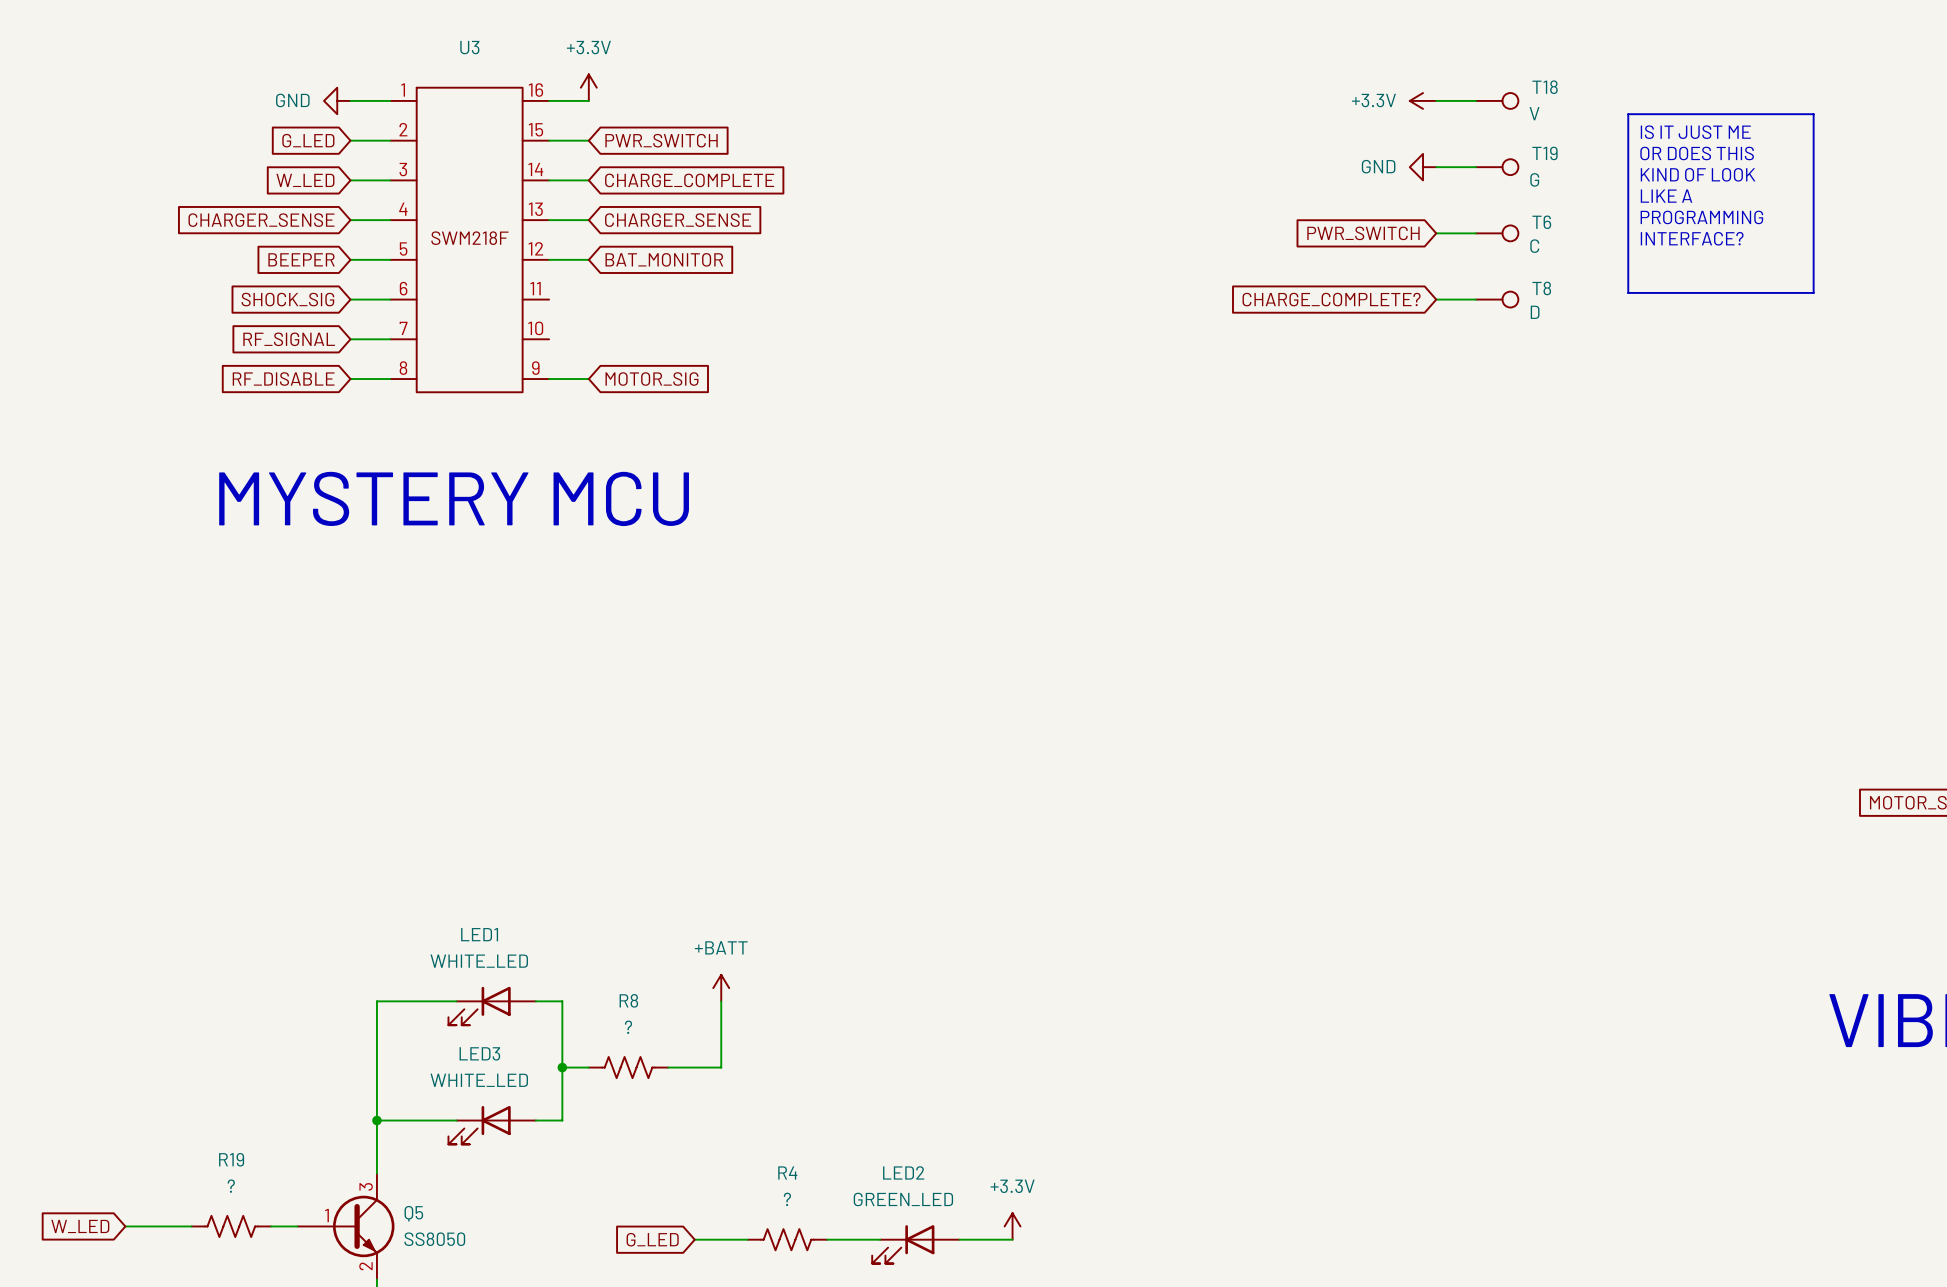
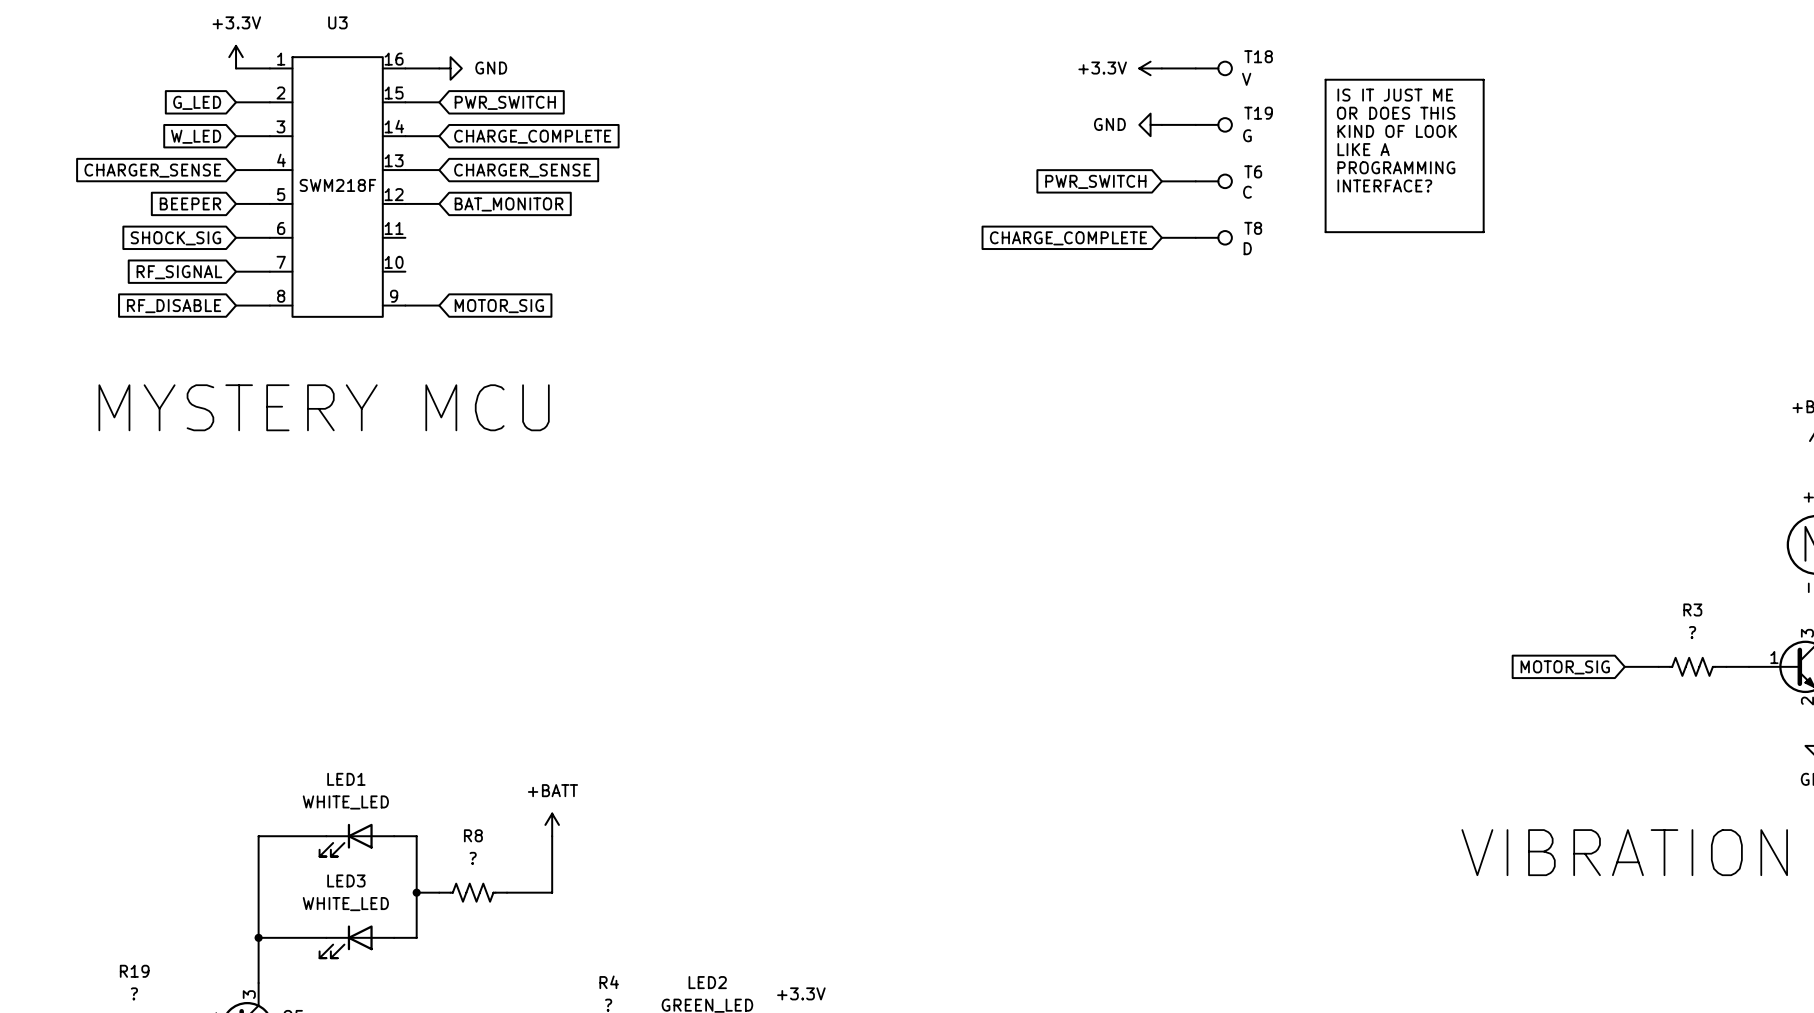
power symbol position: +3.3V (588, 87) -> +3.3V (236, 57)
power symbol: GND (337, 100) -> none
power symbol: none -> GND (450, 68)
global label: CHARGE_COMPLETE? (1331, 299) -> CHARGE_COMPLETE (1068, 238)

